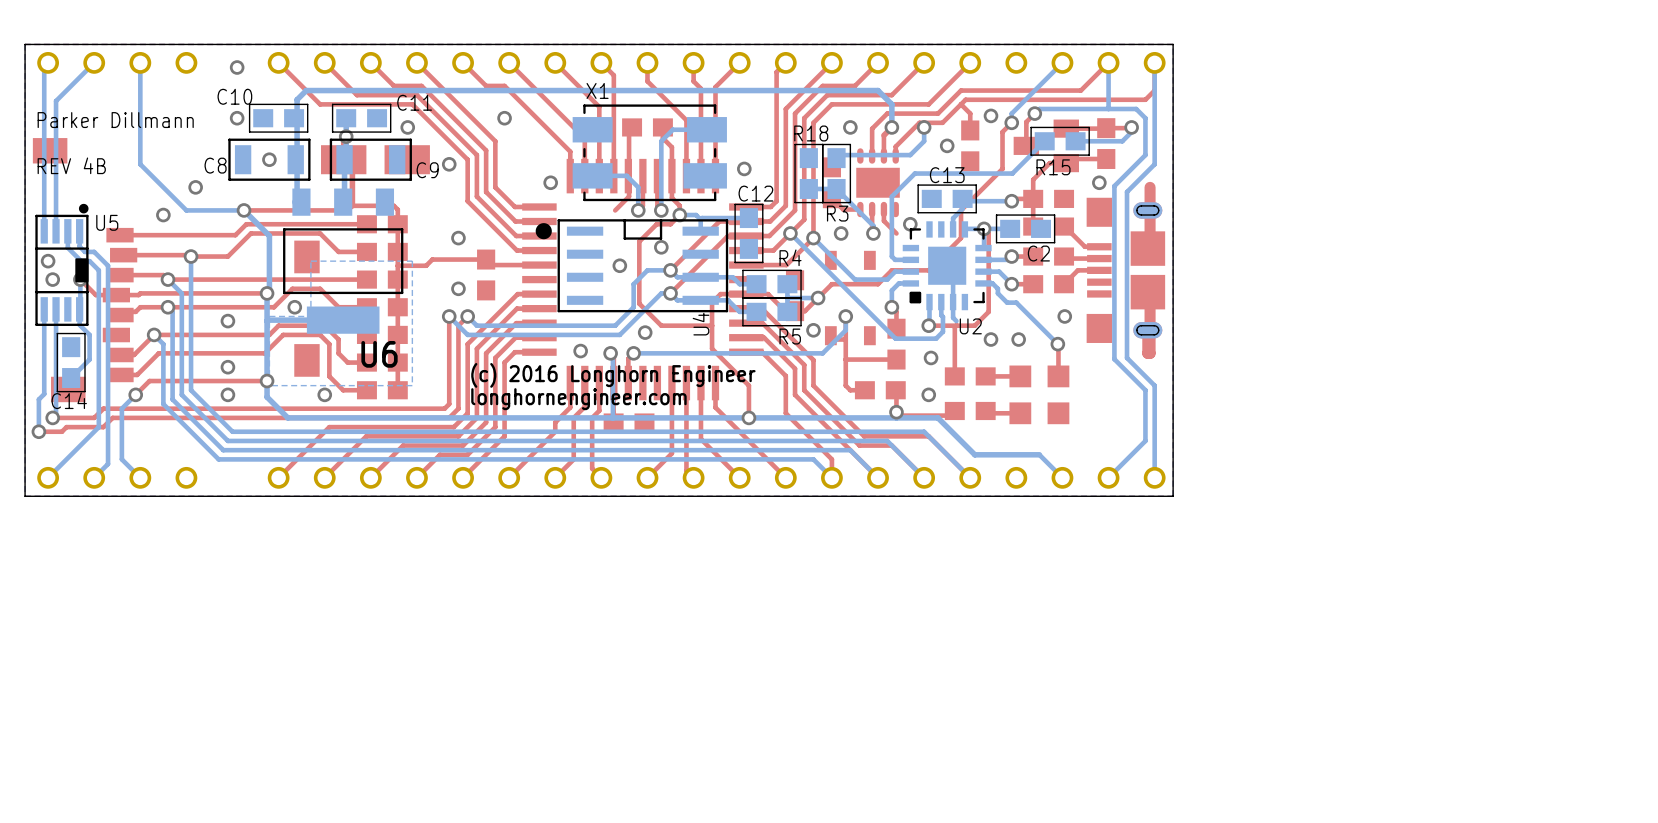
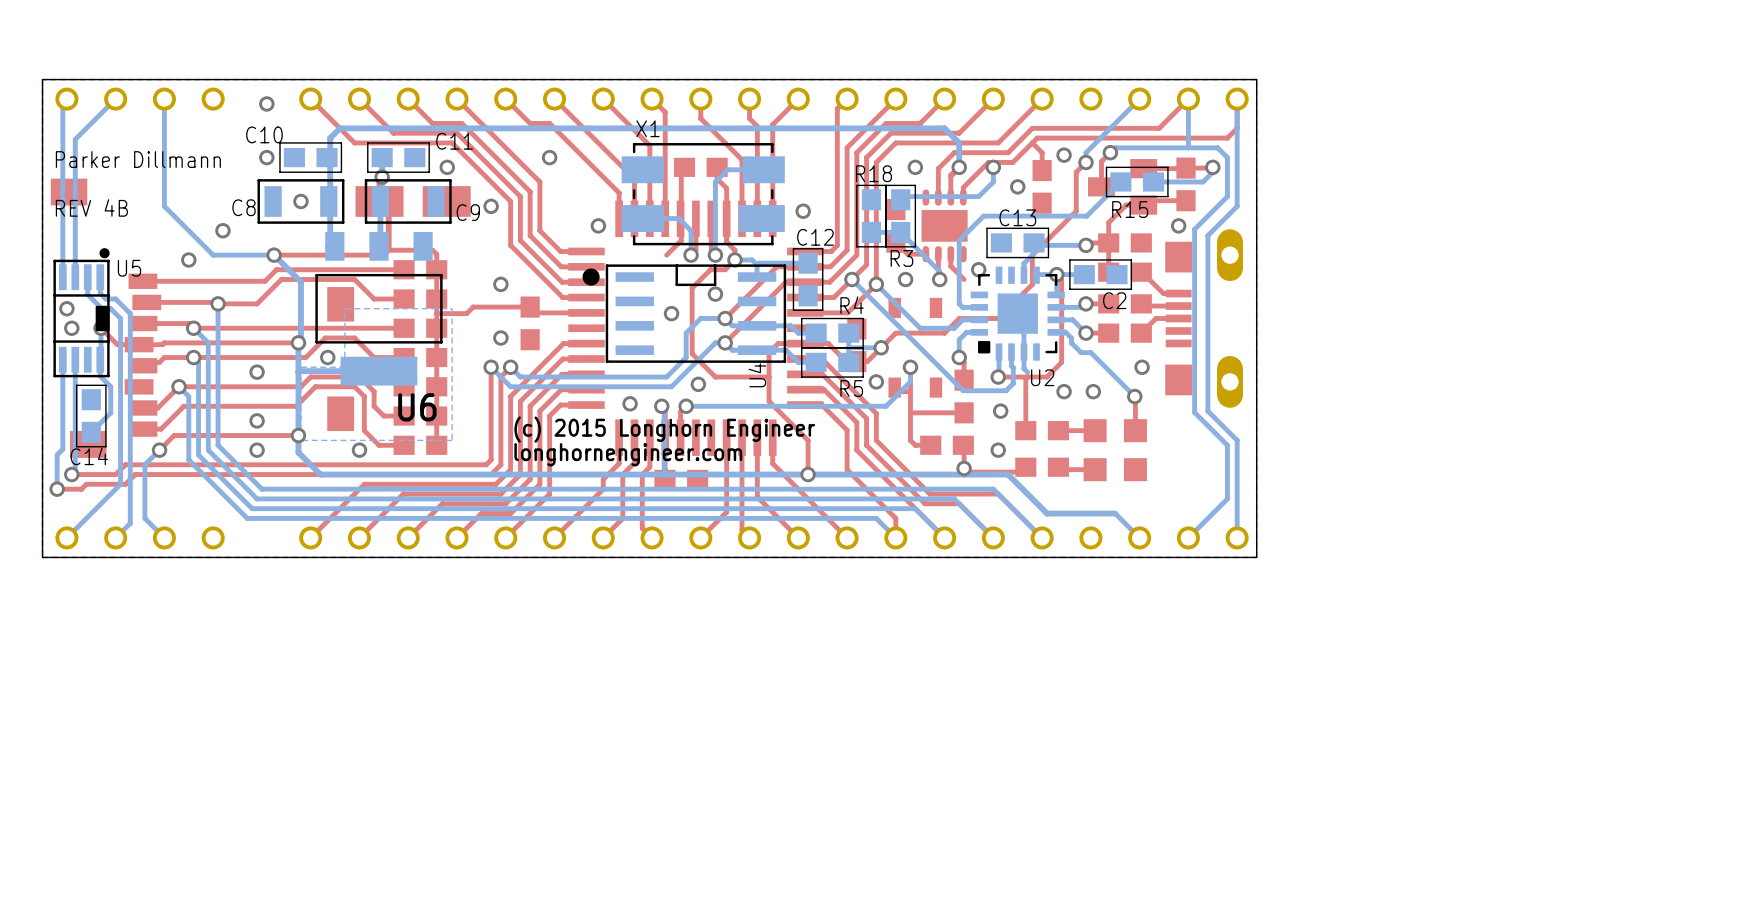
drawing shape: [37, 112, 756, 411] -> [55, 151, 816, 467]
top track: (1150, 187) (1150, 248) (1147, 248) -> none
part footprint: [1086, 197, 1166, 343] -> [1165, 229, 1243, 408]
top track: (1147, 292) (1150, 292) (1150, 353) (1147, 353) (1147, 330) (1150, 330) -> none

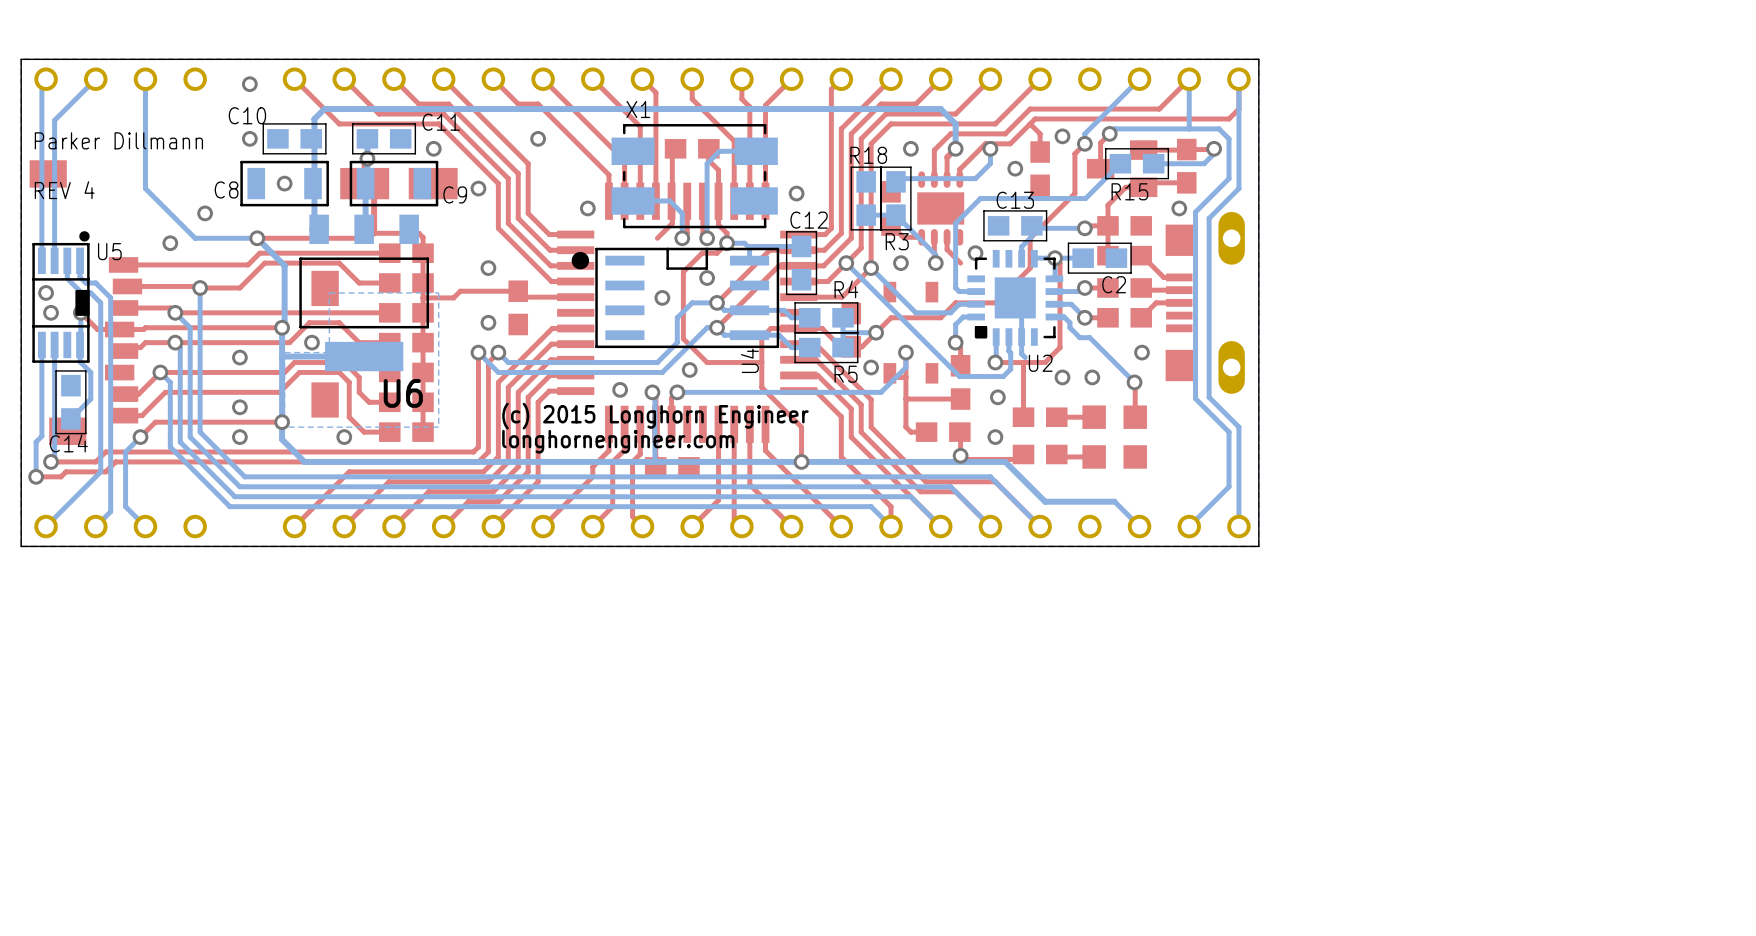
drawing shape: [55, 151, 816, 467] -> [34, 132, 809, 454]

